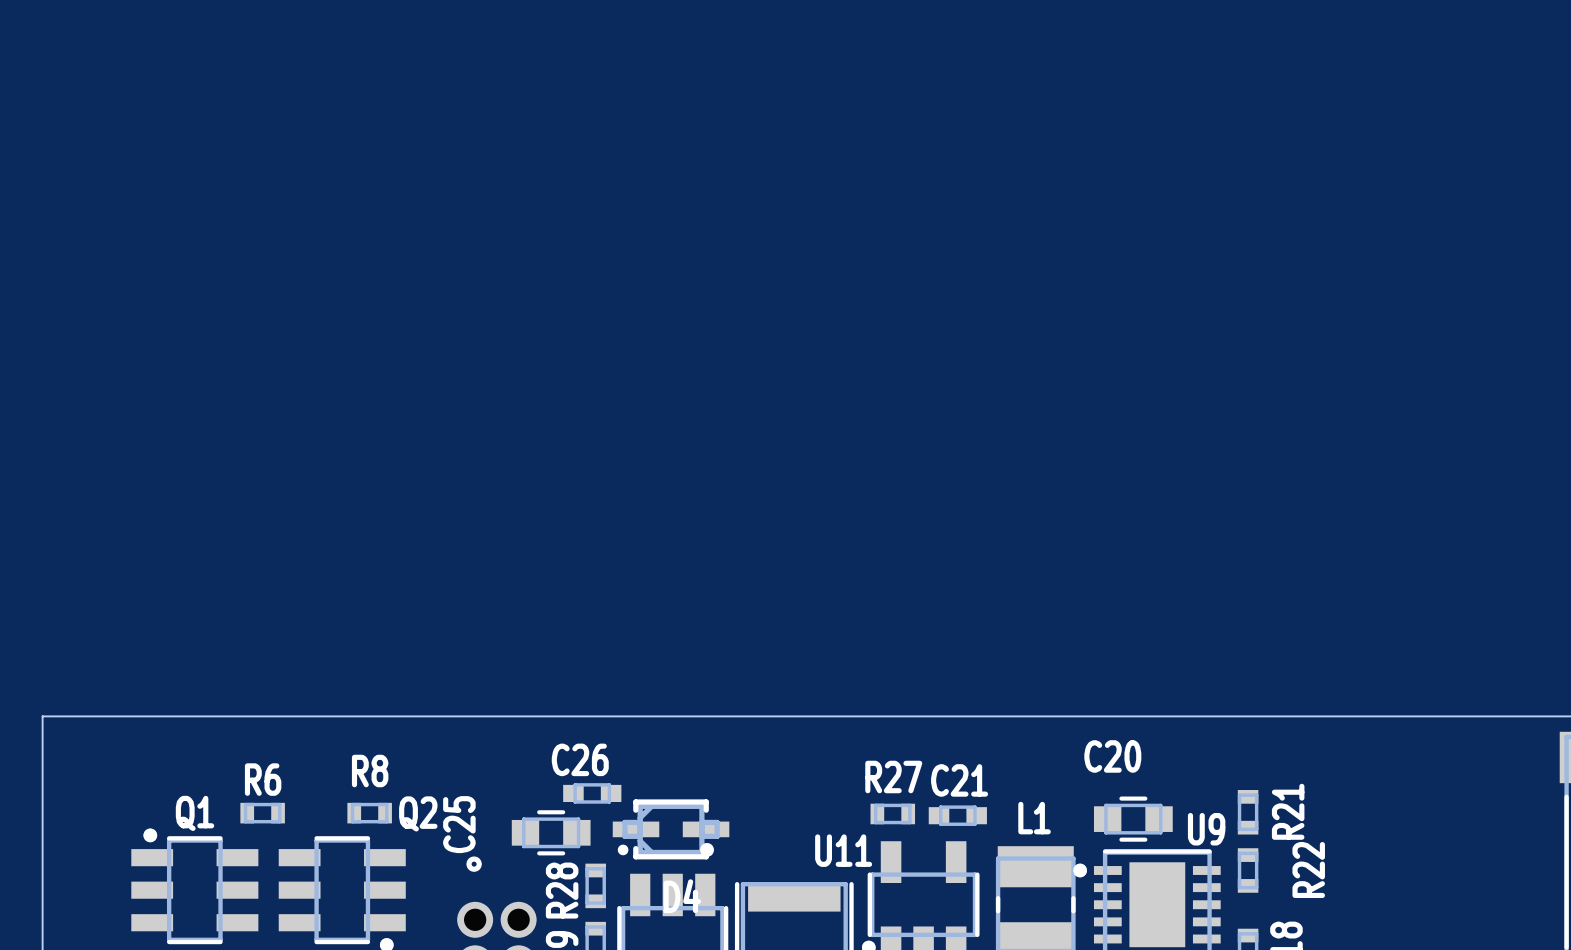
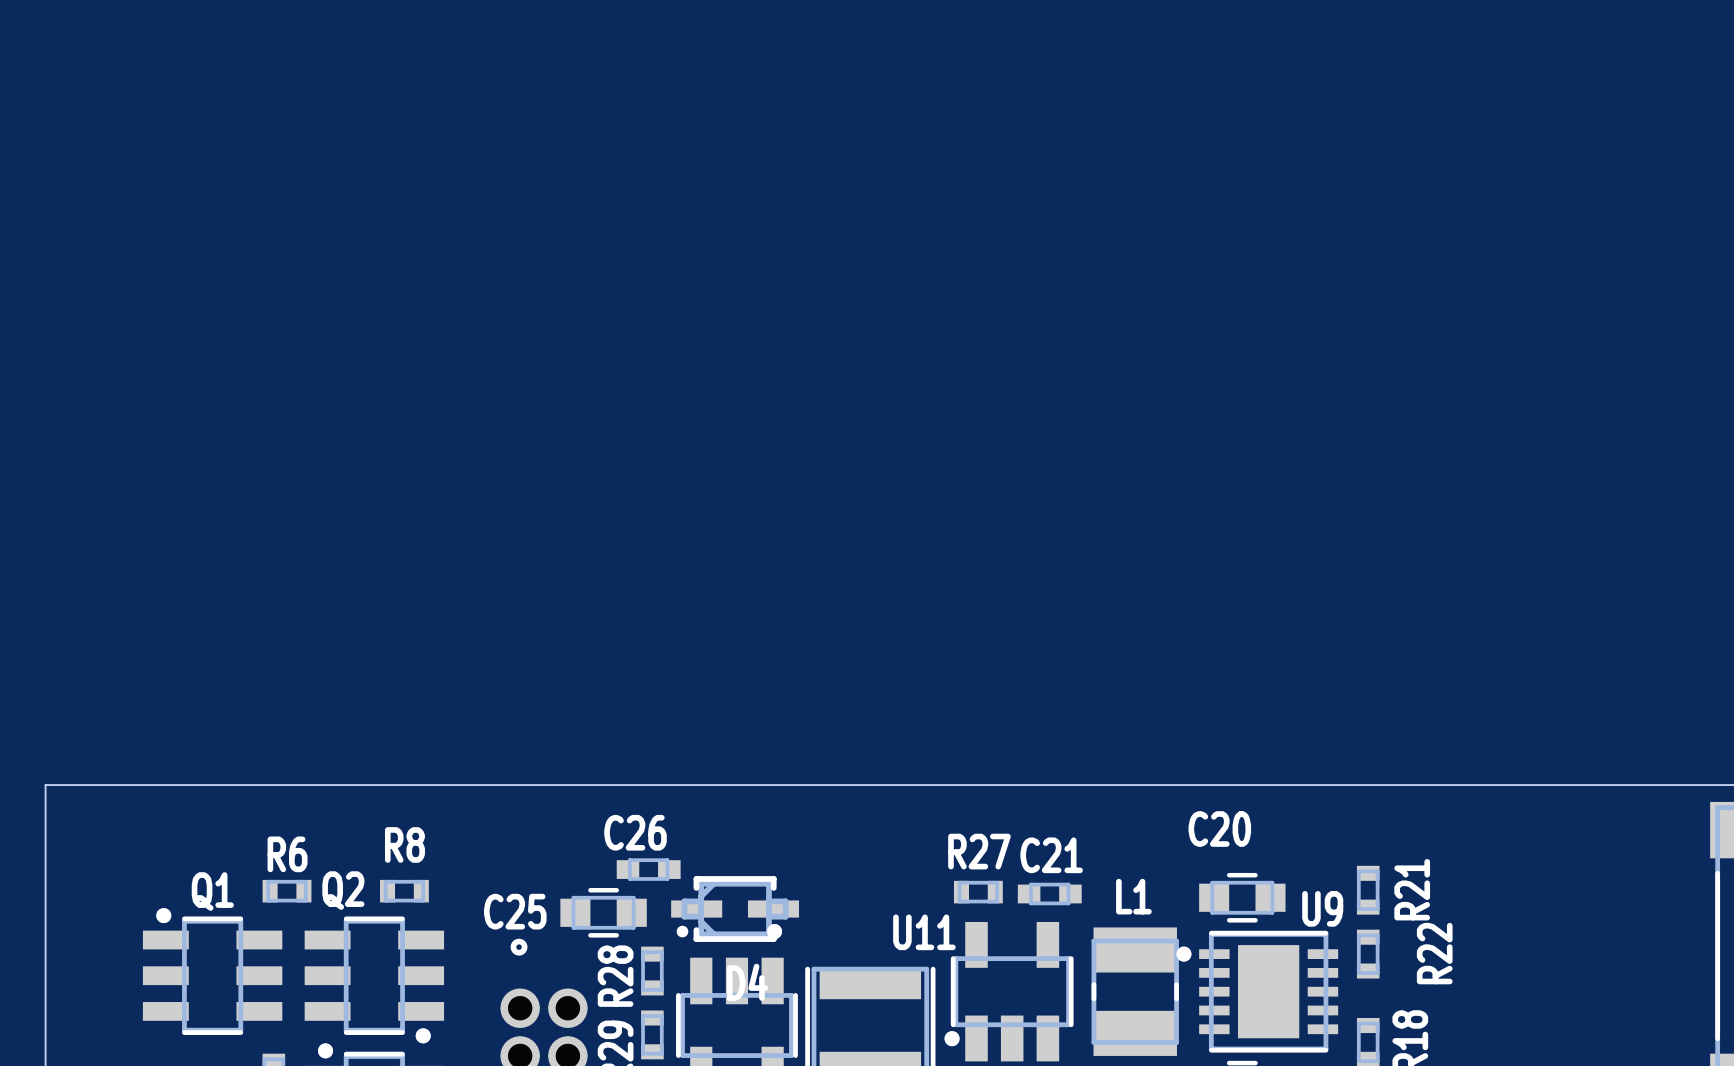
Q2 name position: Q2 (418, 813) -> Q2 (343, 890)
C25 name rotation: 0° (459, 824) -> 90° clockwise (515, 911)

